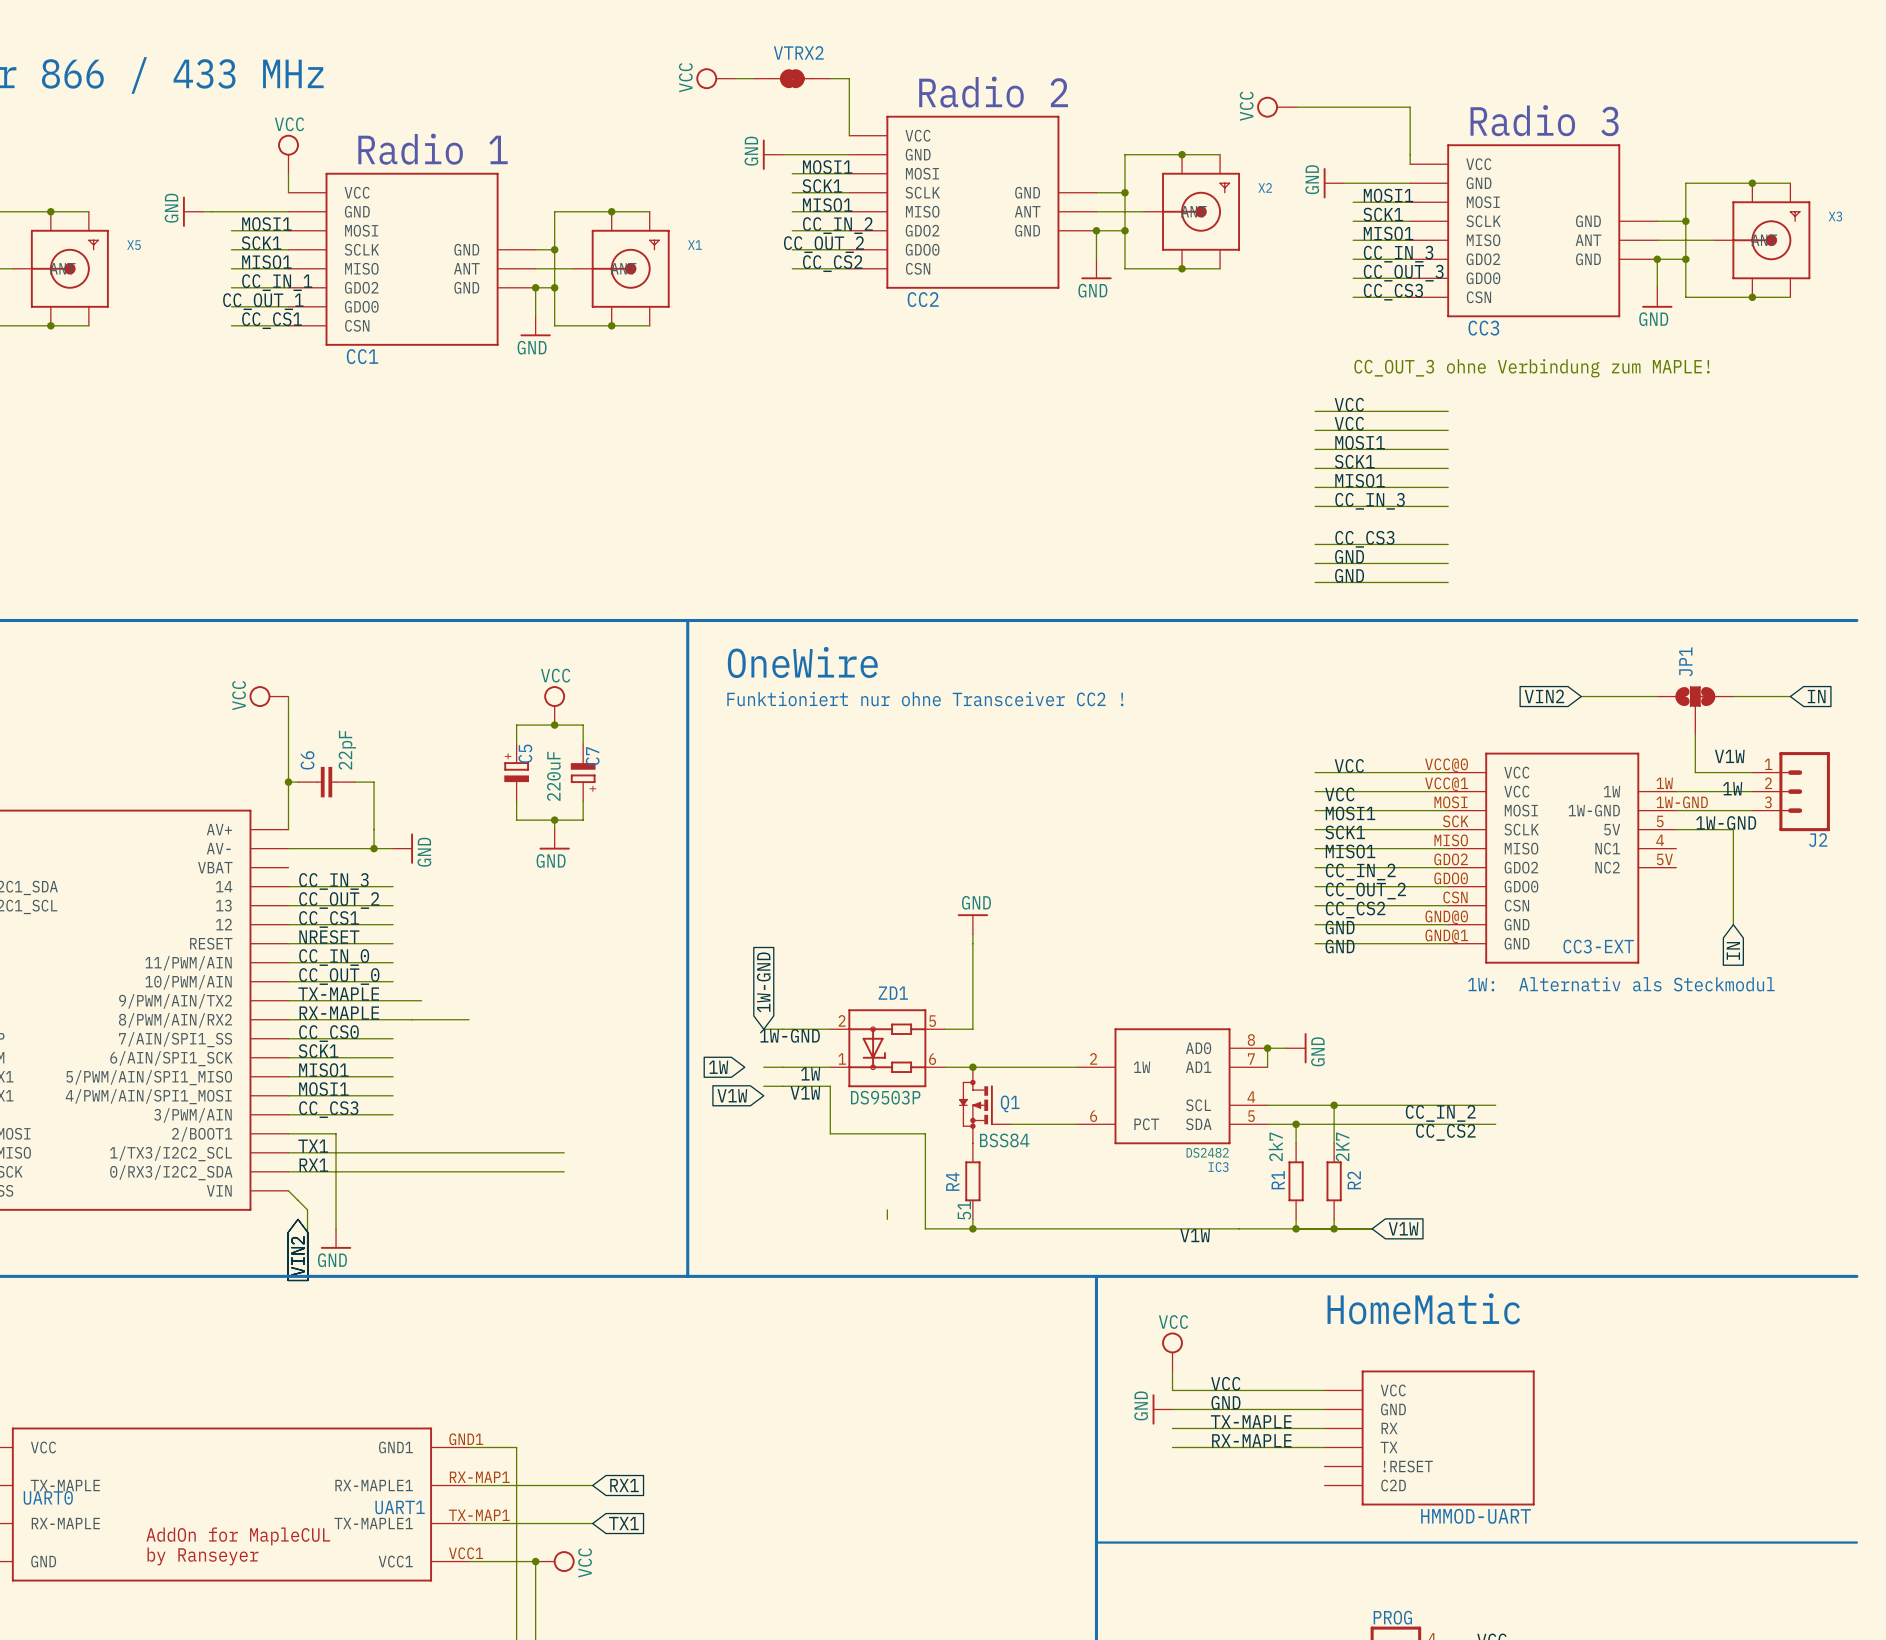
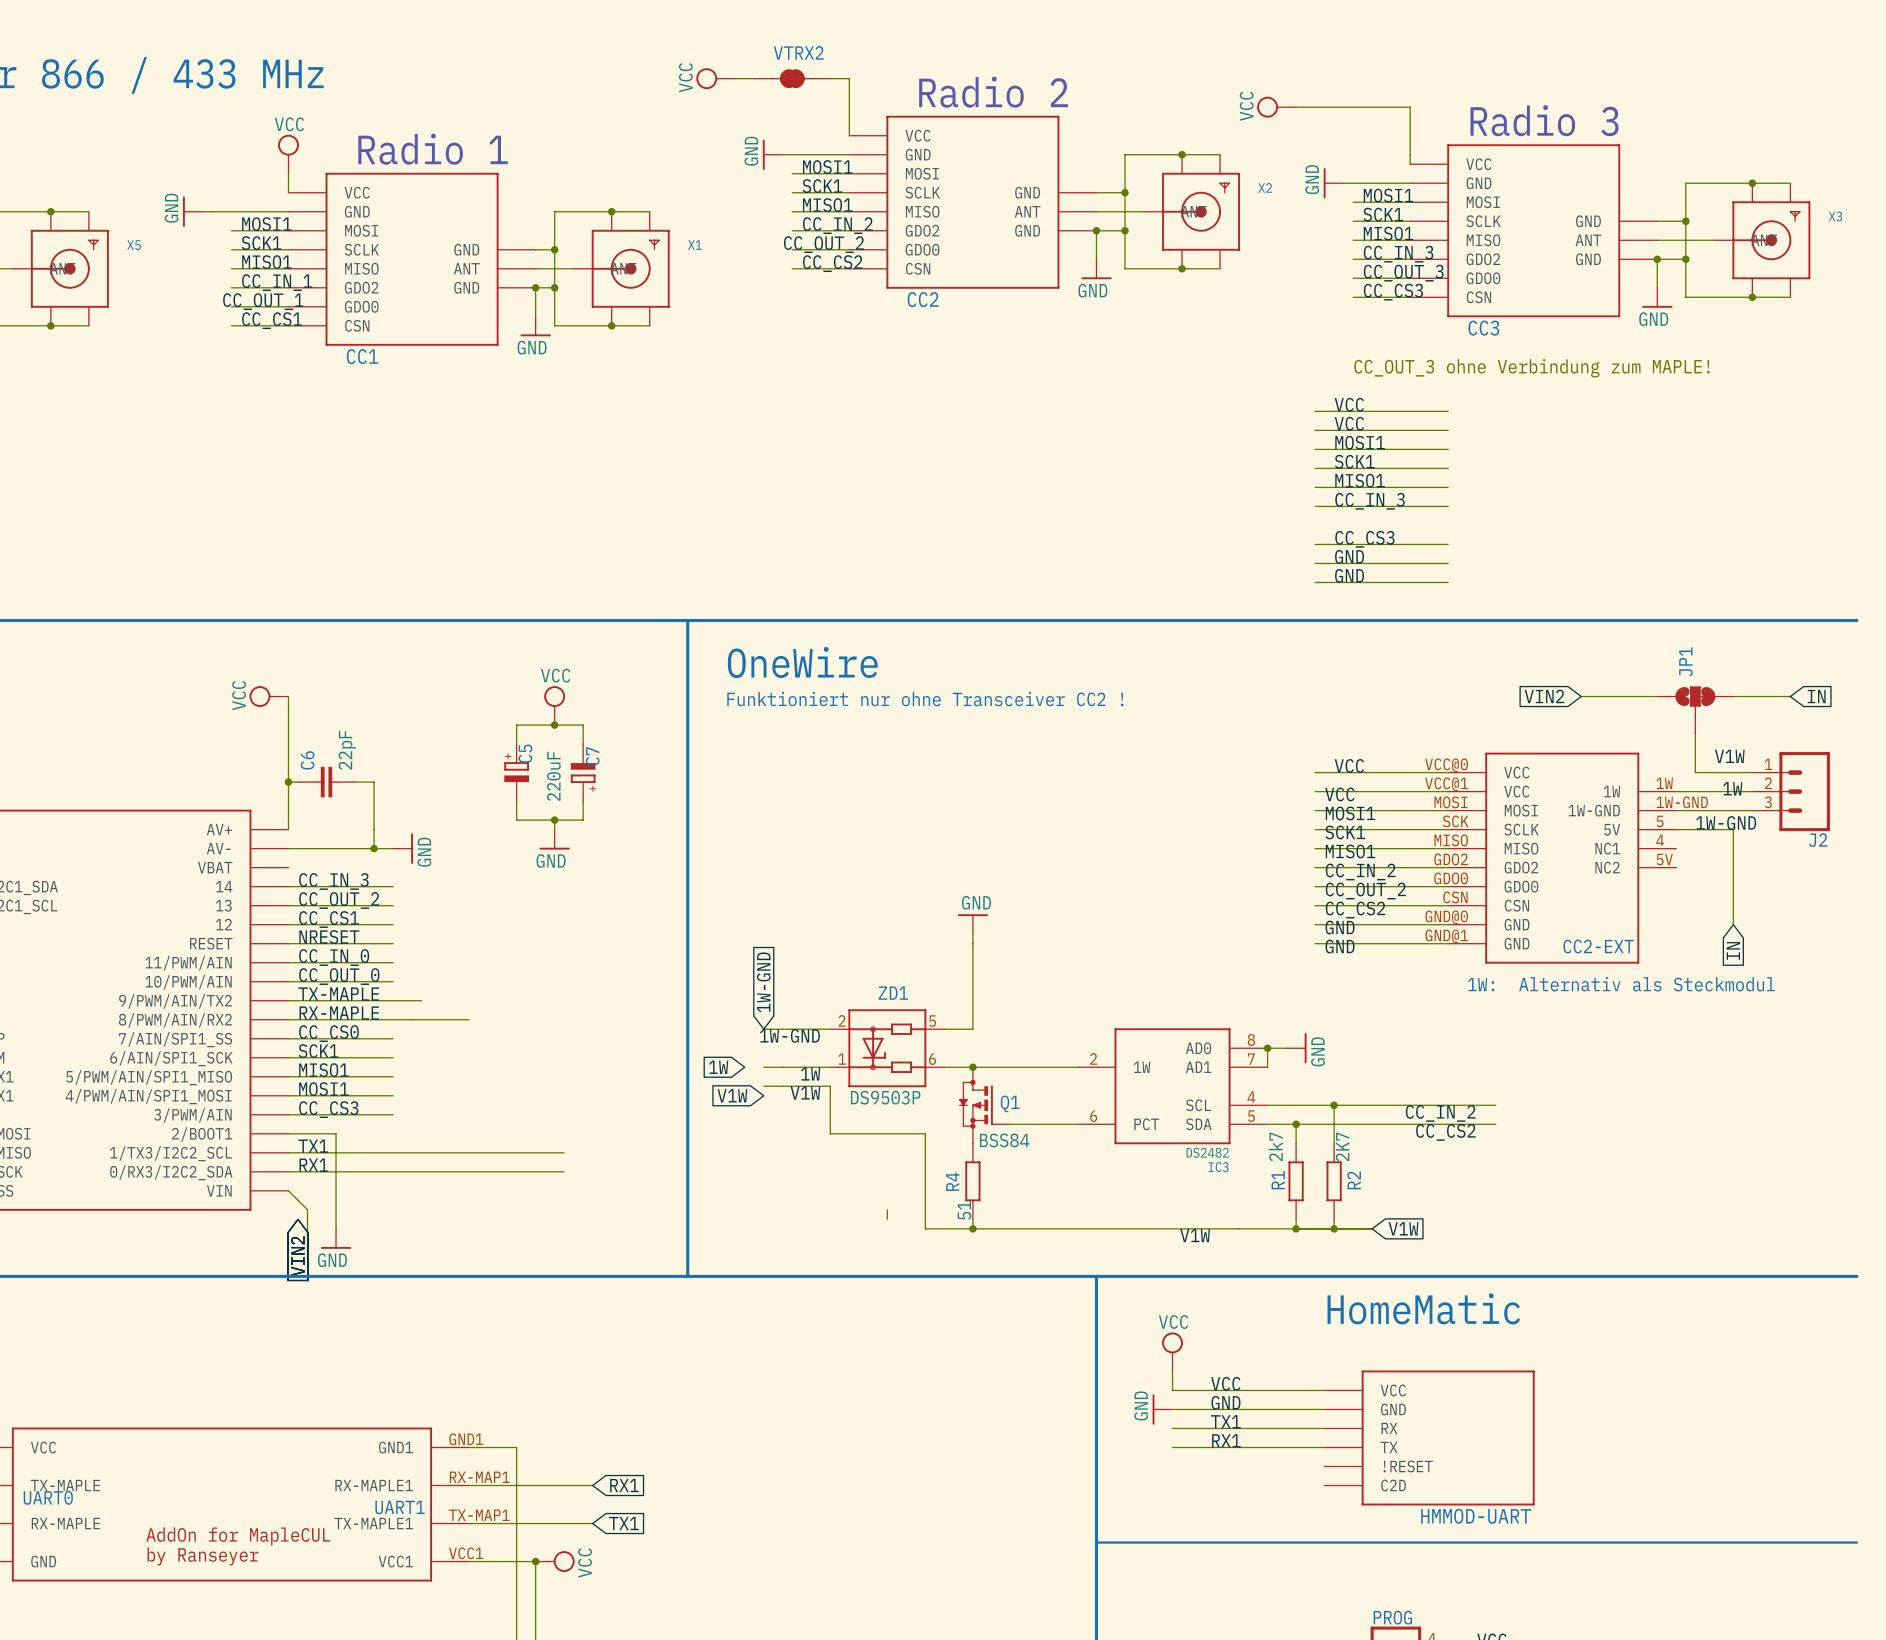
CC3-EXT name: CC3-EXT (1598, 946) -> CC2-EXT (1598, 946)
label: TX-MAPLE (1251, 1421) -> TX1 (1225, 1421)
label: RX-MAPLE (1251, 1440) -> RX1 (1226, 1440)

